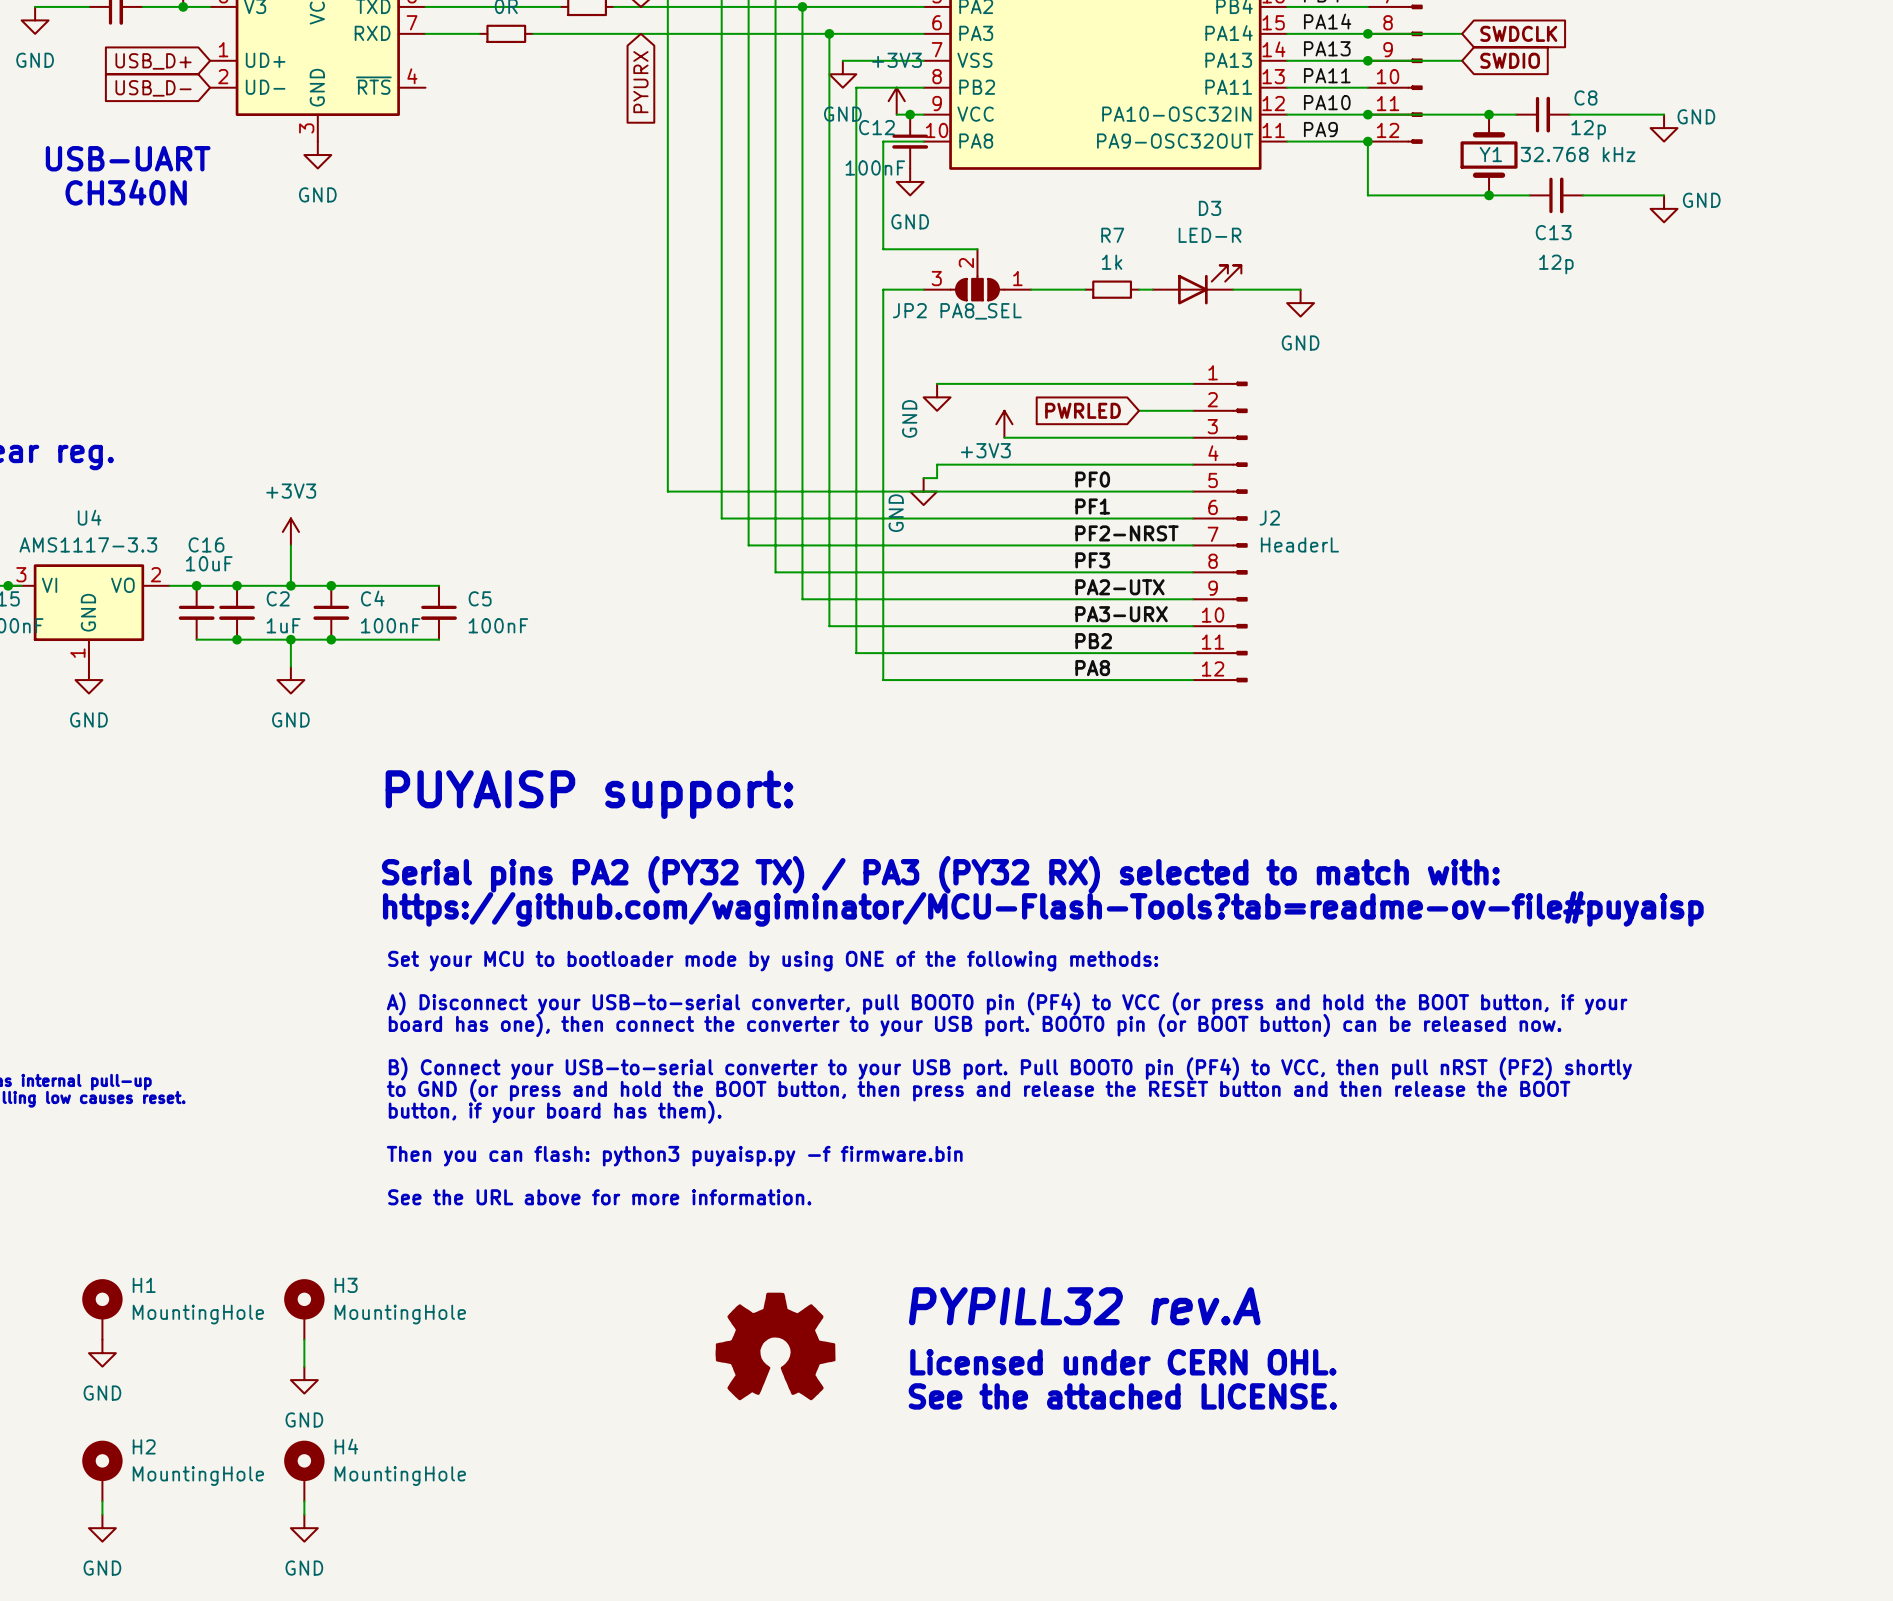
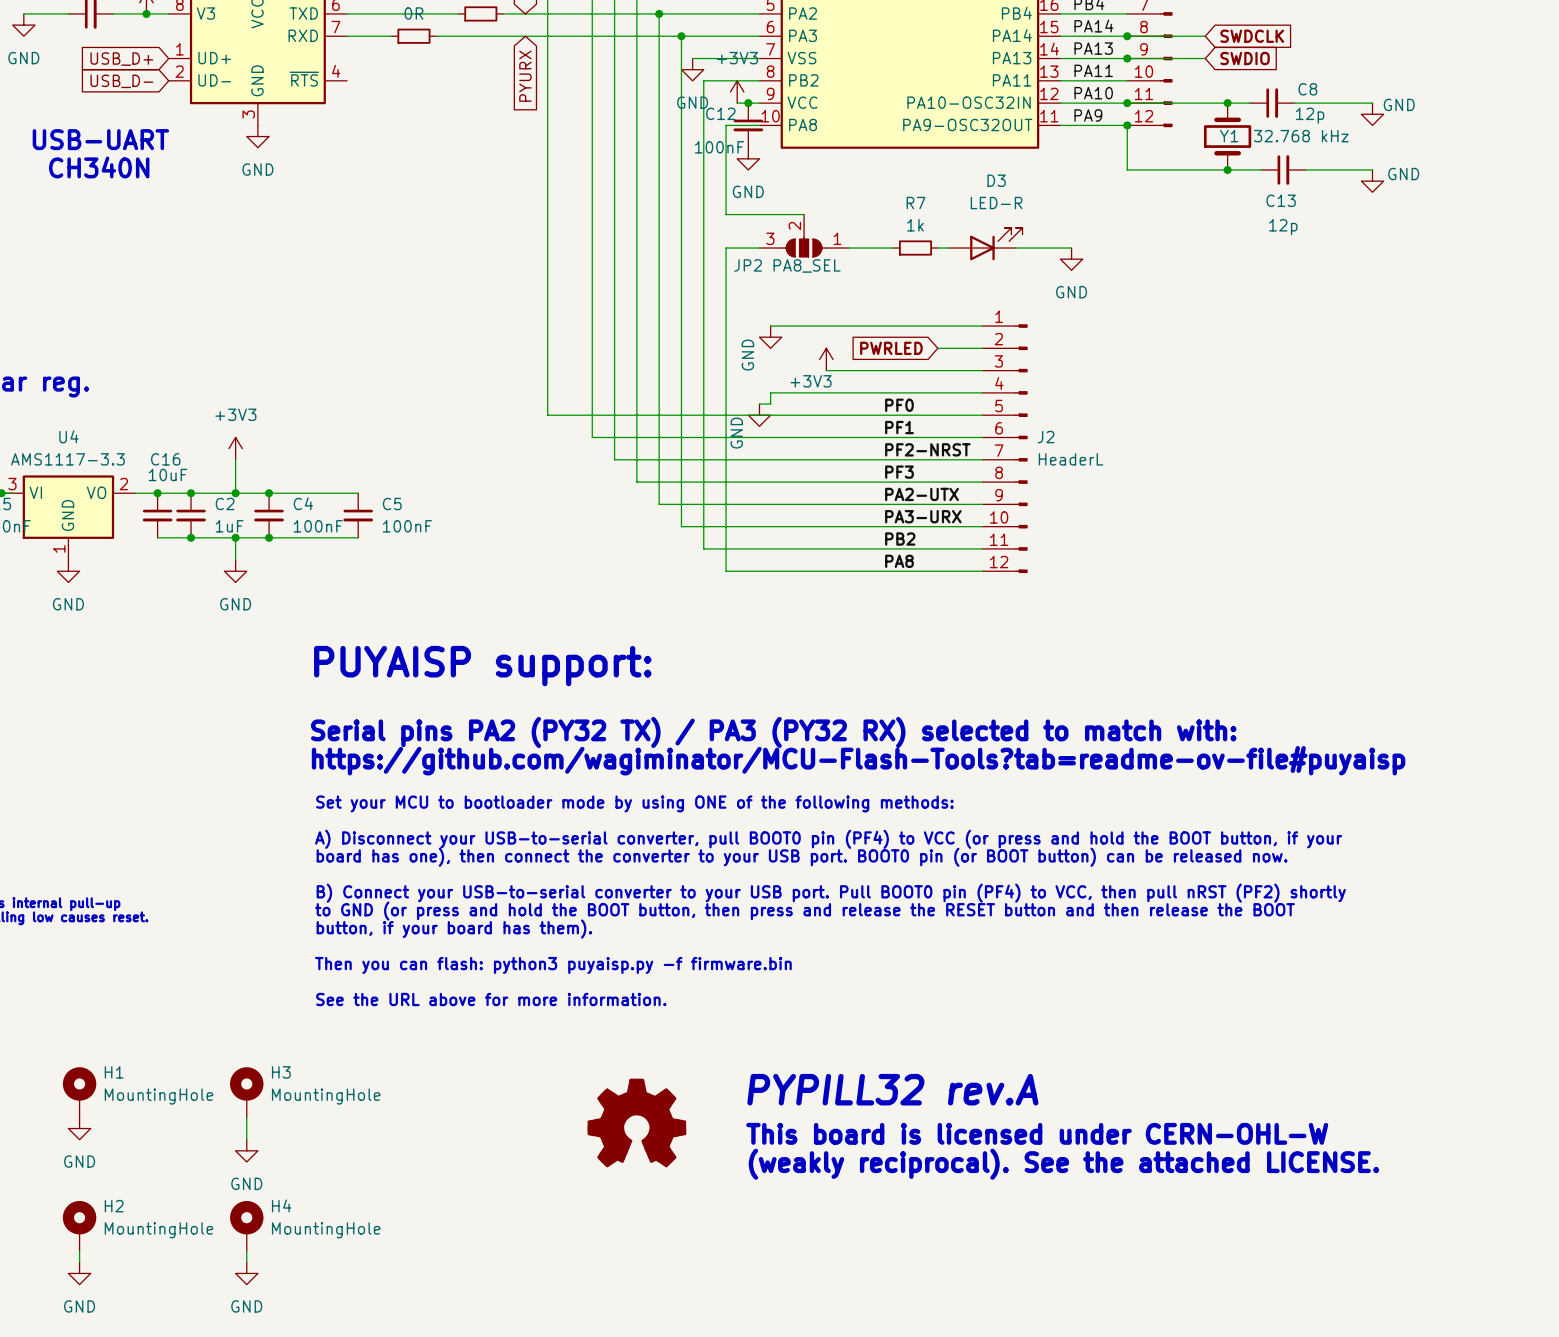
text: Licensed under CERN OHL. (1123, 1362) -> This board is licensed under CERN-OHL-W (1037, 1133)
text: See the attached LICENSE. (1122, 1396) -> (weakly reciprocal). See the attached LICENSE. (1063, 1164)

